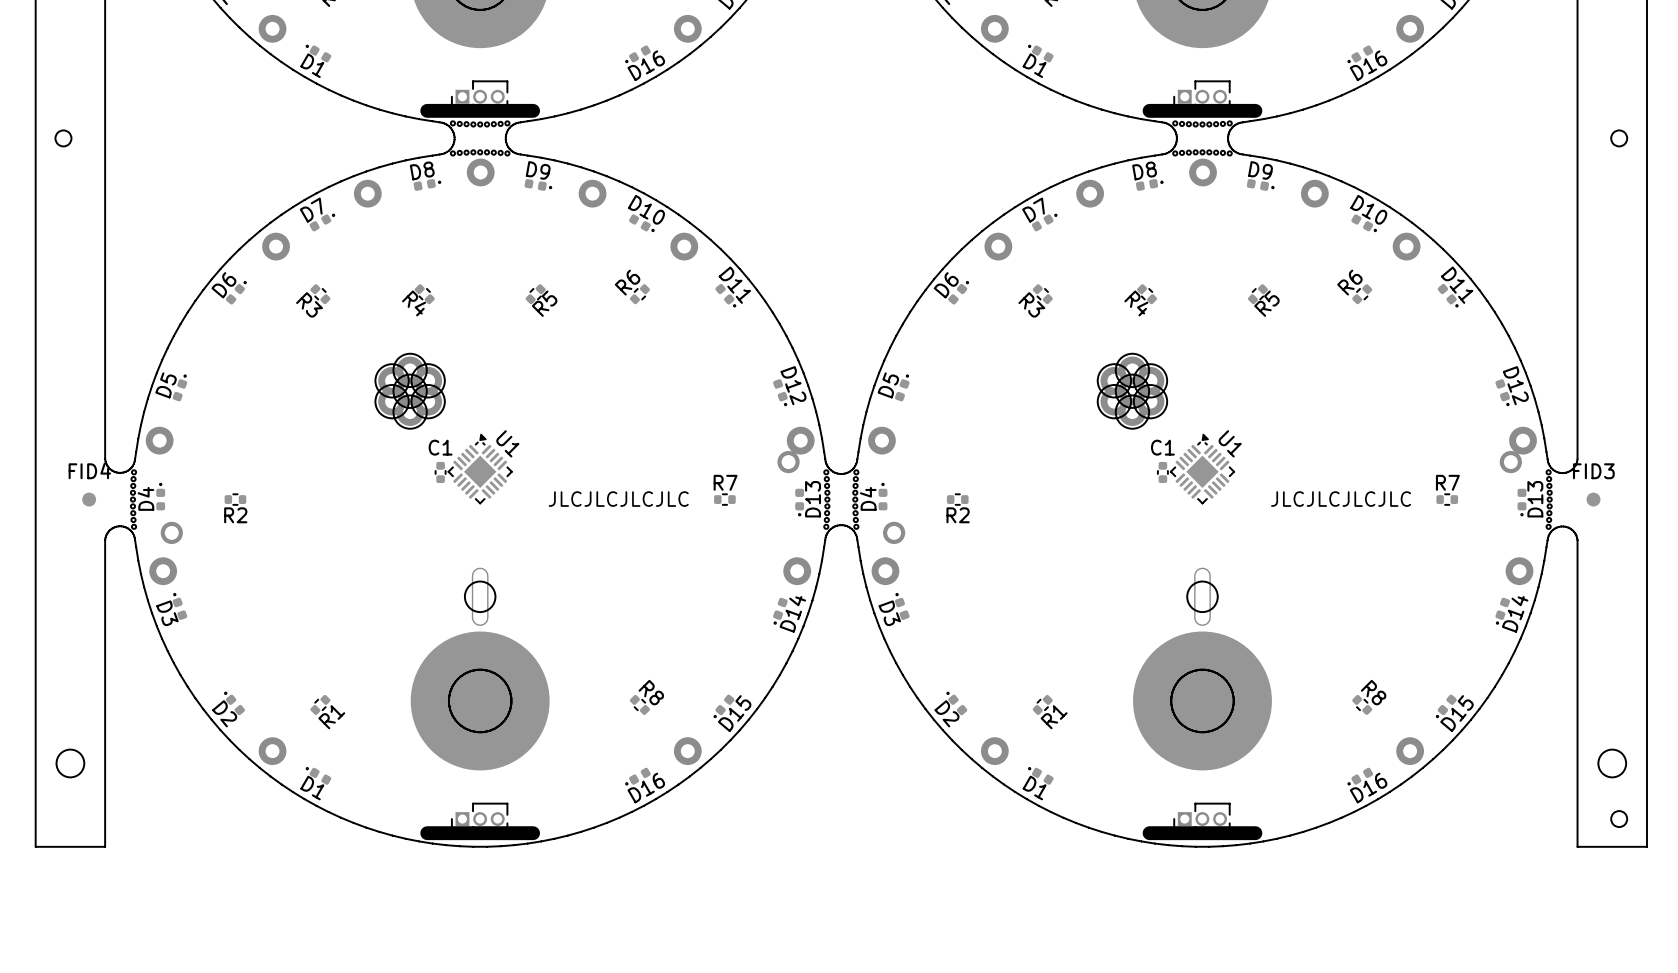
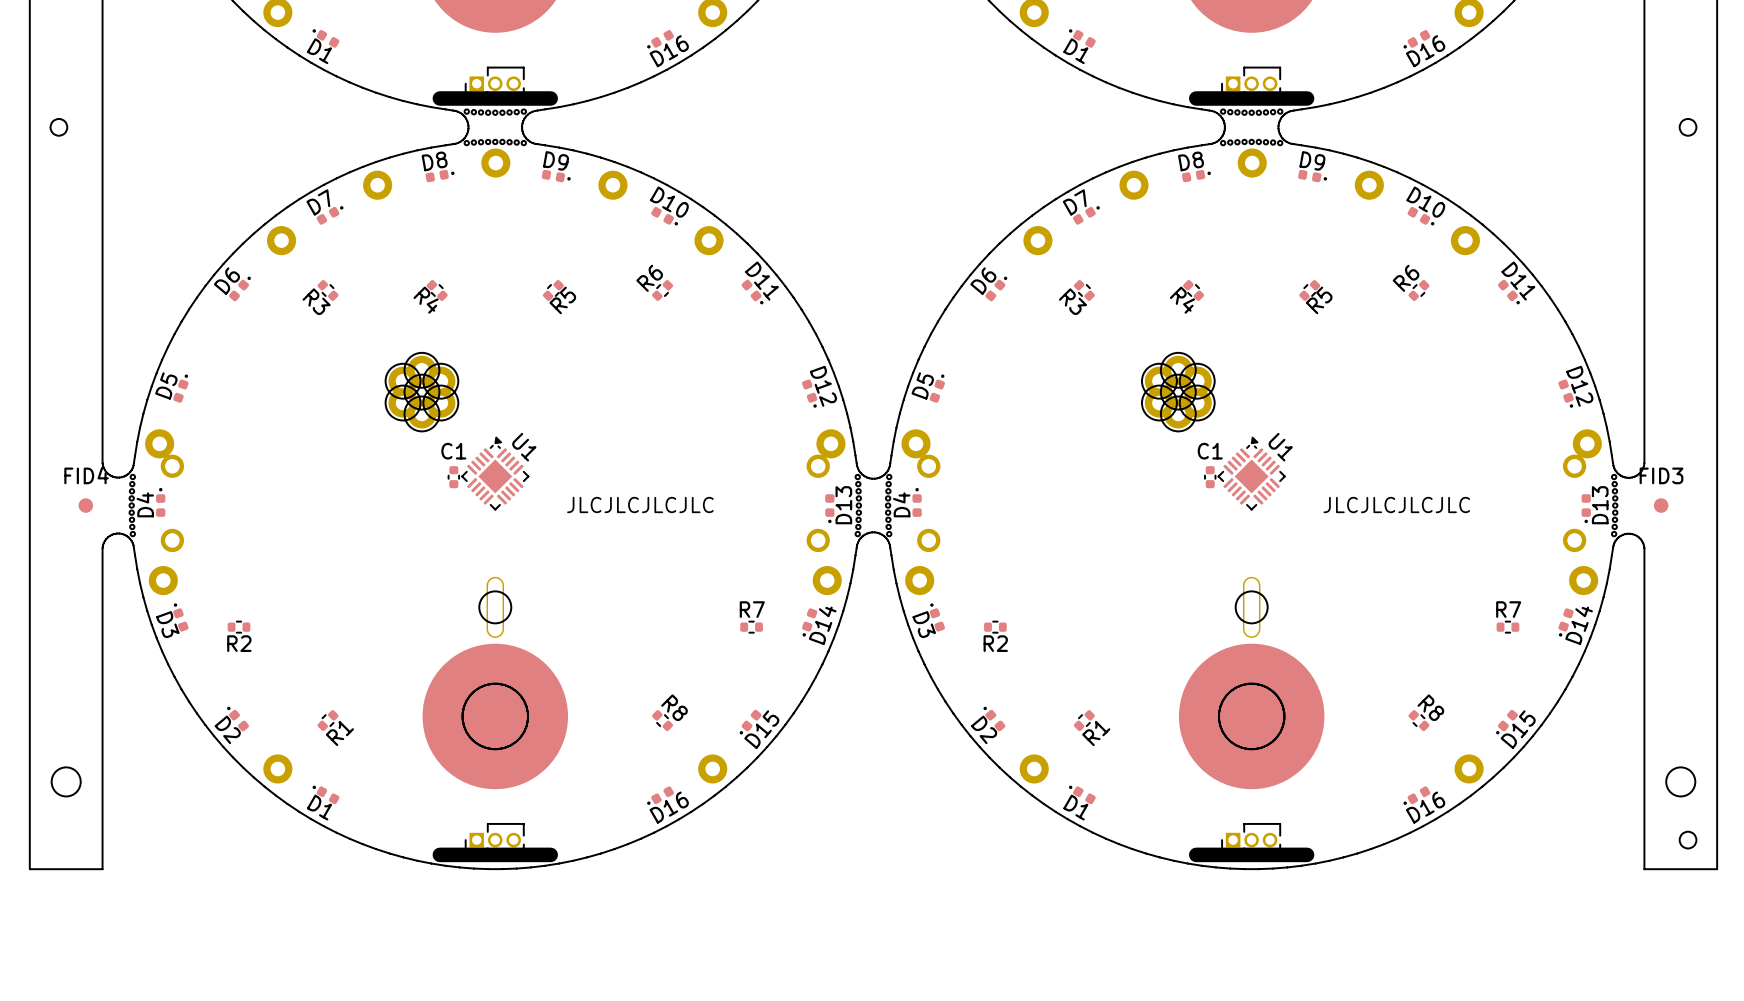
part: none -> (172, 466)
part: none -> (928, 466)
R2 position: (235, 499) -> (239, 627)
R7 position: (724, 499) -> (751, 627)
R2 position: (957, 499) -> (995, 627)
R7 position: (1447, 499) -> (1507, 627)
part: none -> (818, 540)
part: none -> (1574, 540)

